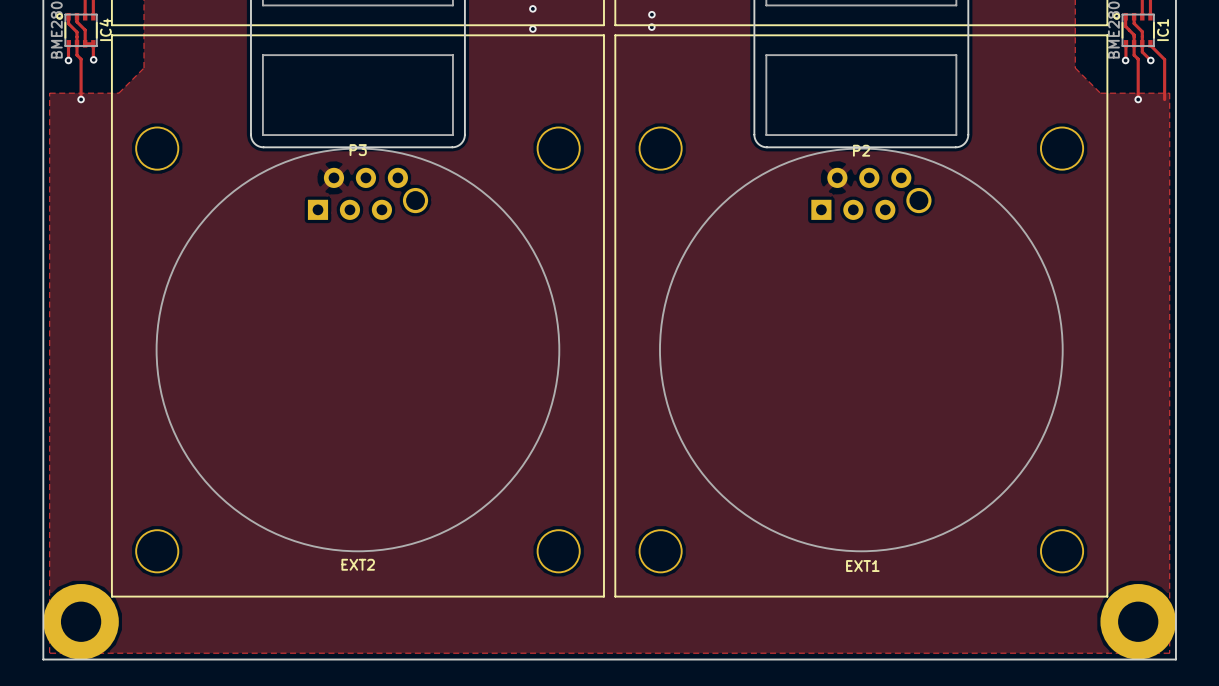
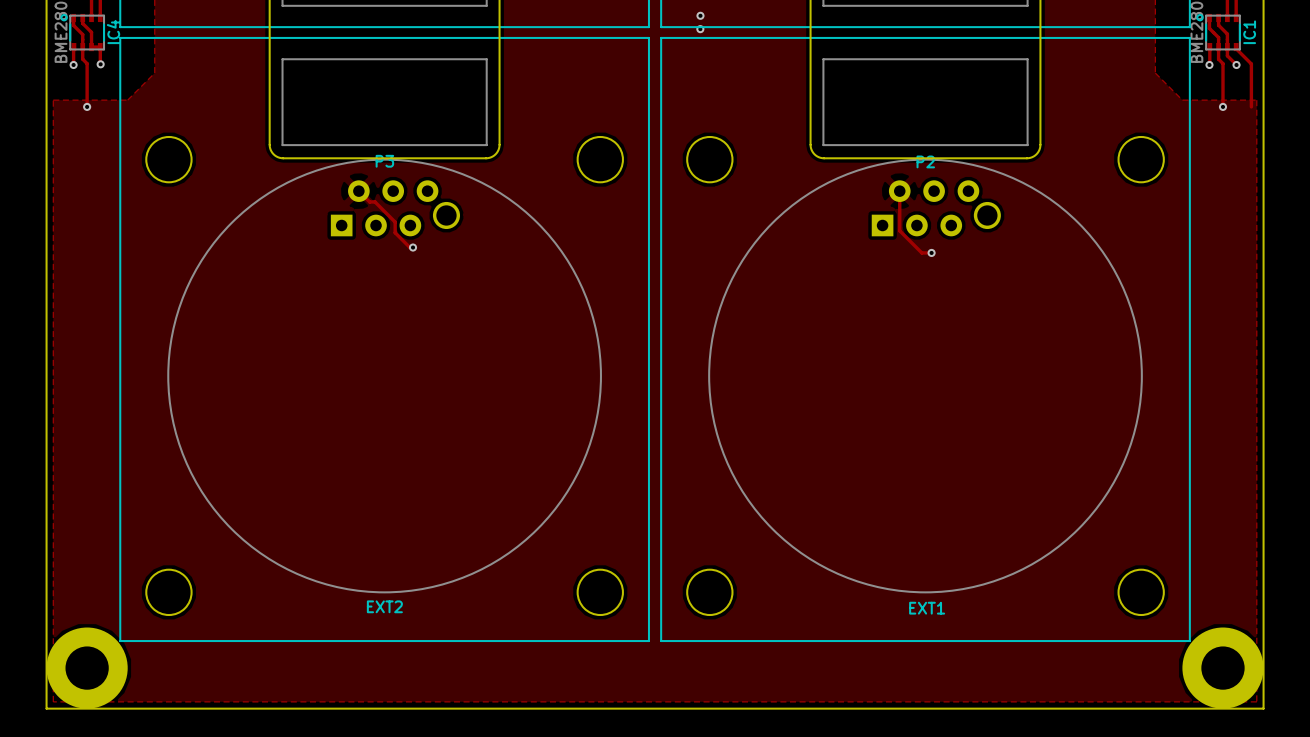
via: (532, 8) -> none
via: (532, 29) -> none
track: none -> (358, 191) (369, 201) (375, 201) (395, 222) (395, 232) (409, 247) (413, 247)
track: none -> (899, 191) (899, 230) (921, 252) (931, 252)
via: none -> (413, 247)
via: none -> (931, 252)

